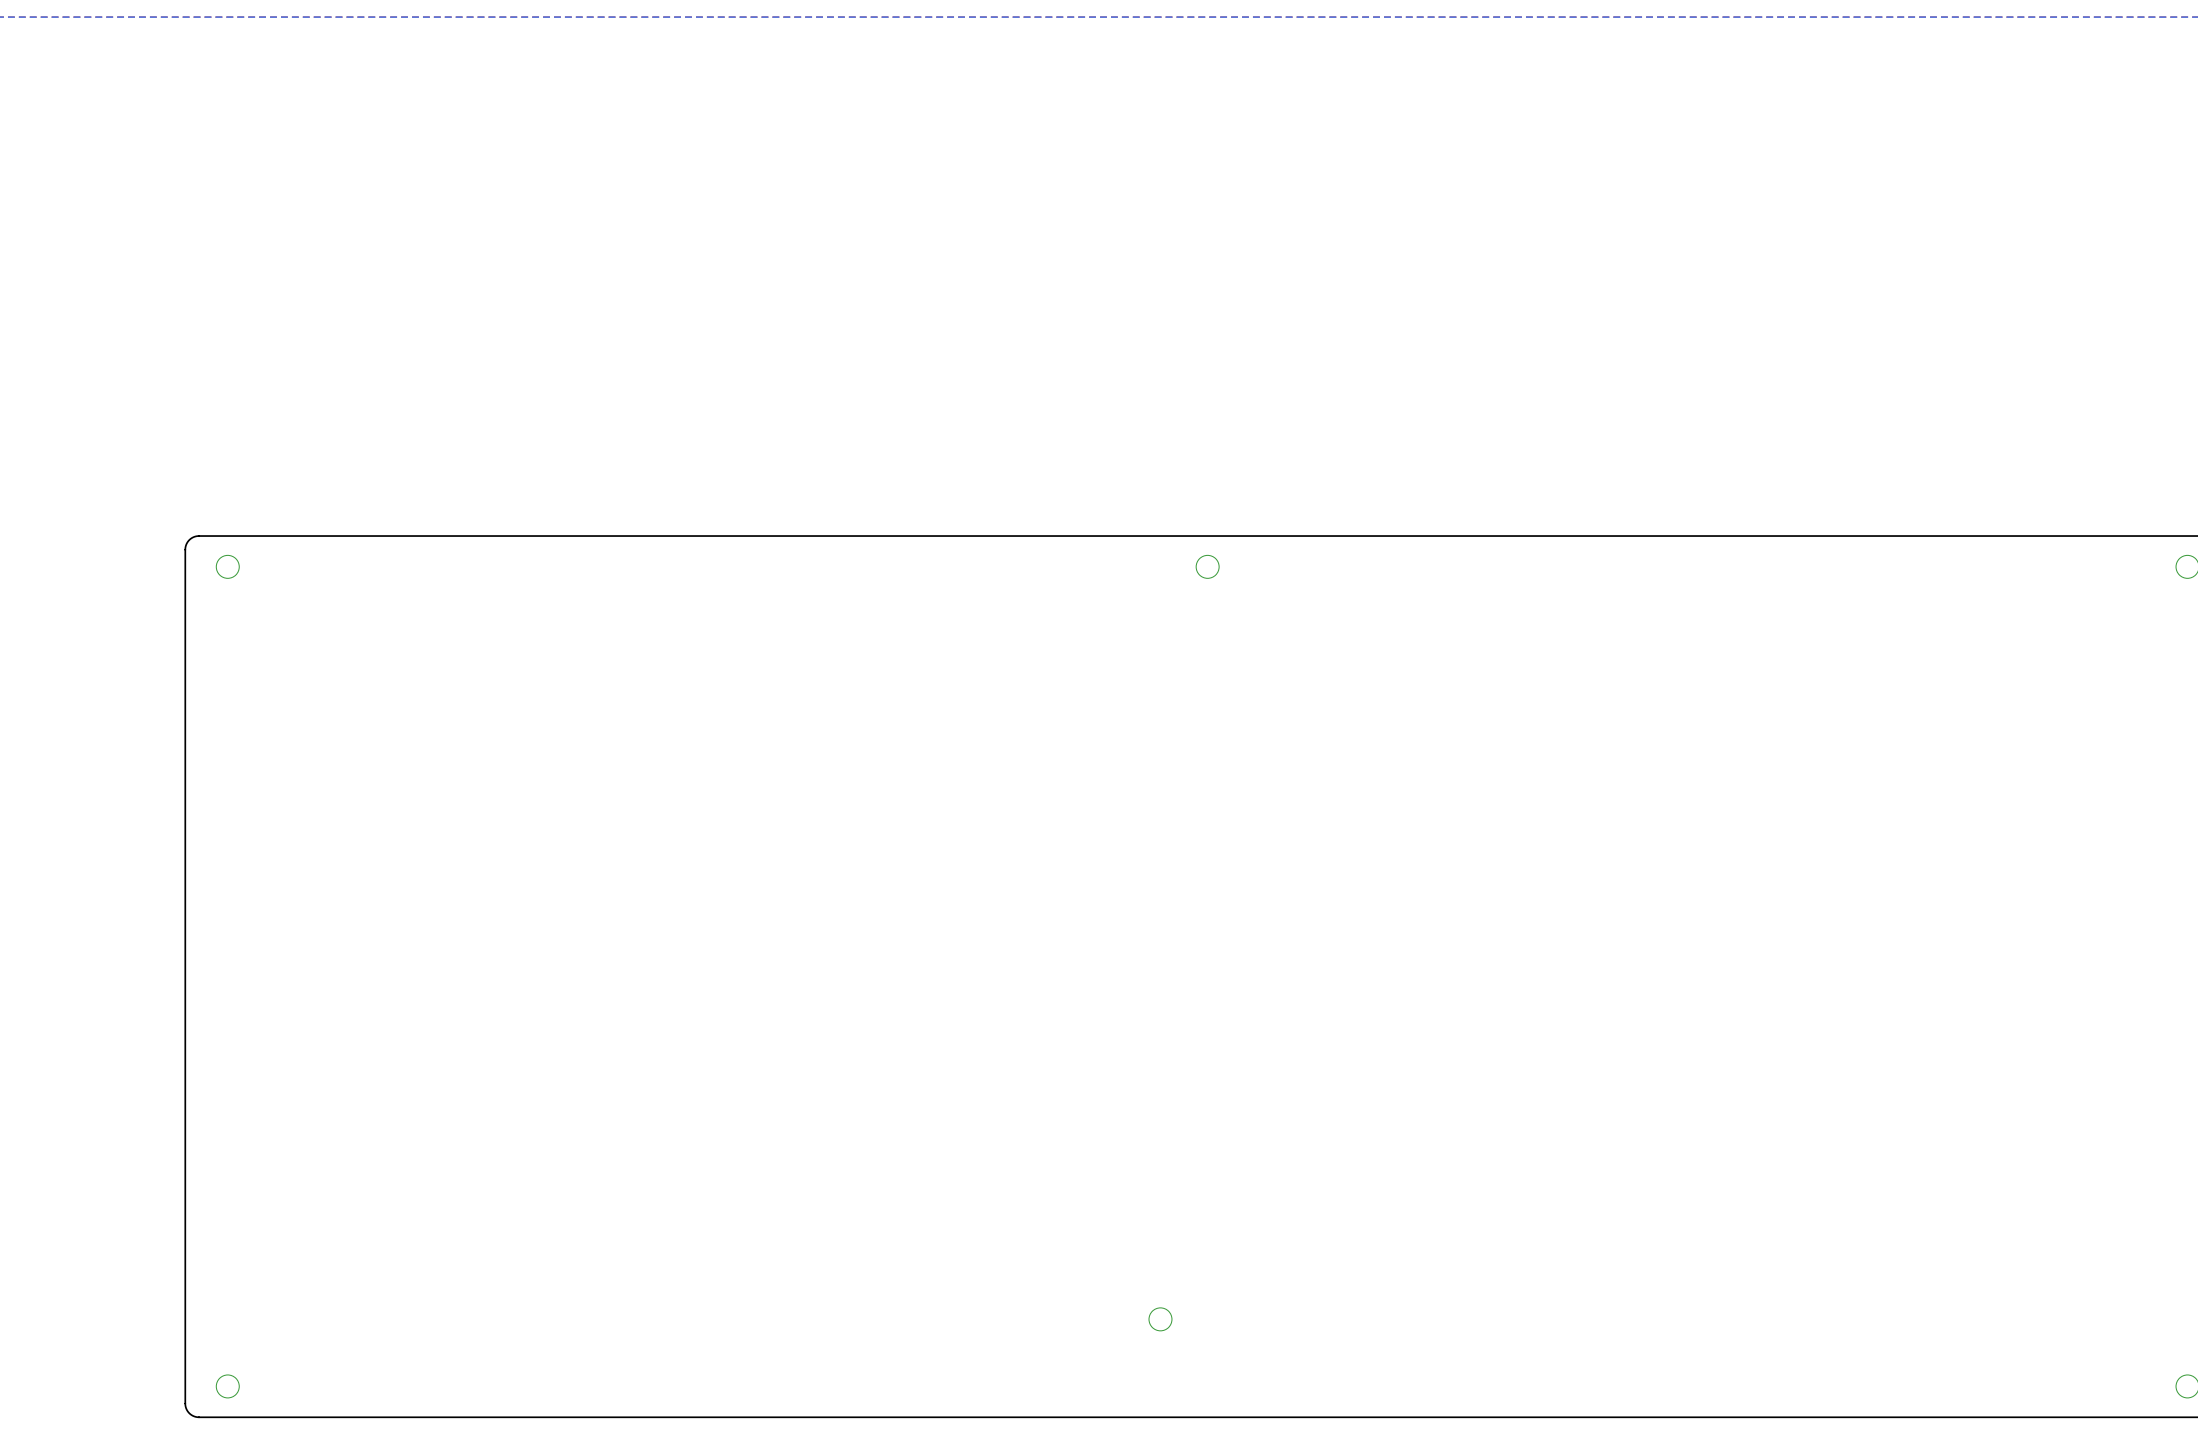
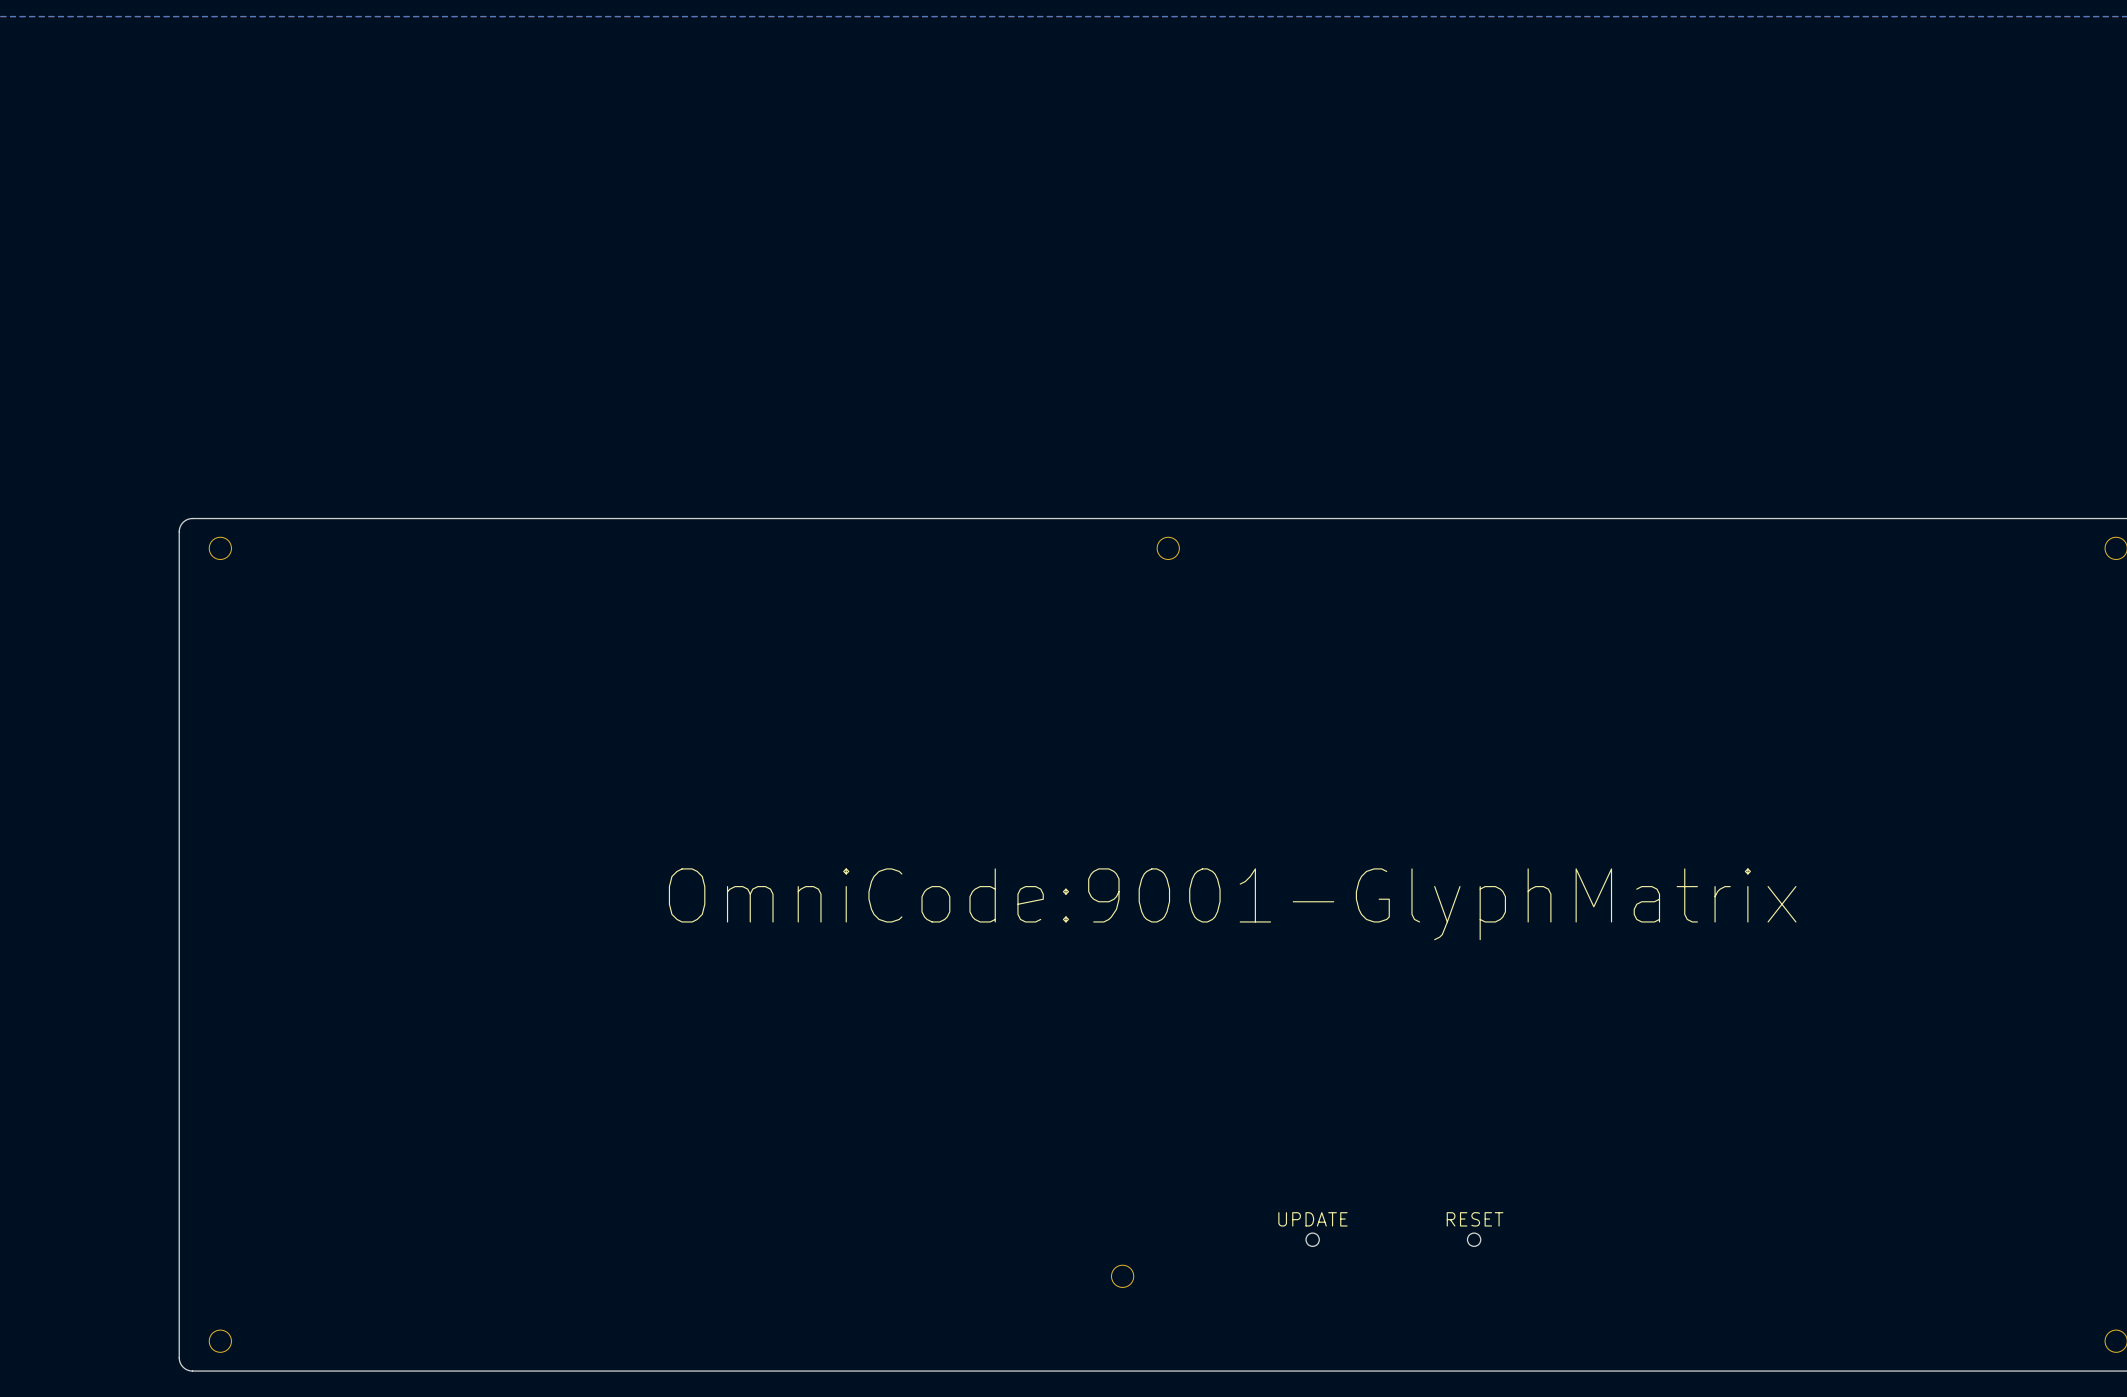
text: none -> OmniCode:9001-GlyphMatrix (1232, 904)
text: none -> UPDATE (1312, 1219)
text: none -> RESET (1475, 1219)
round board edge: none -> [1305, 1232, 1320, 1247]
round board edge: none -> [1466, 1232, 1482, 1247]

